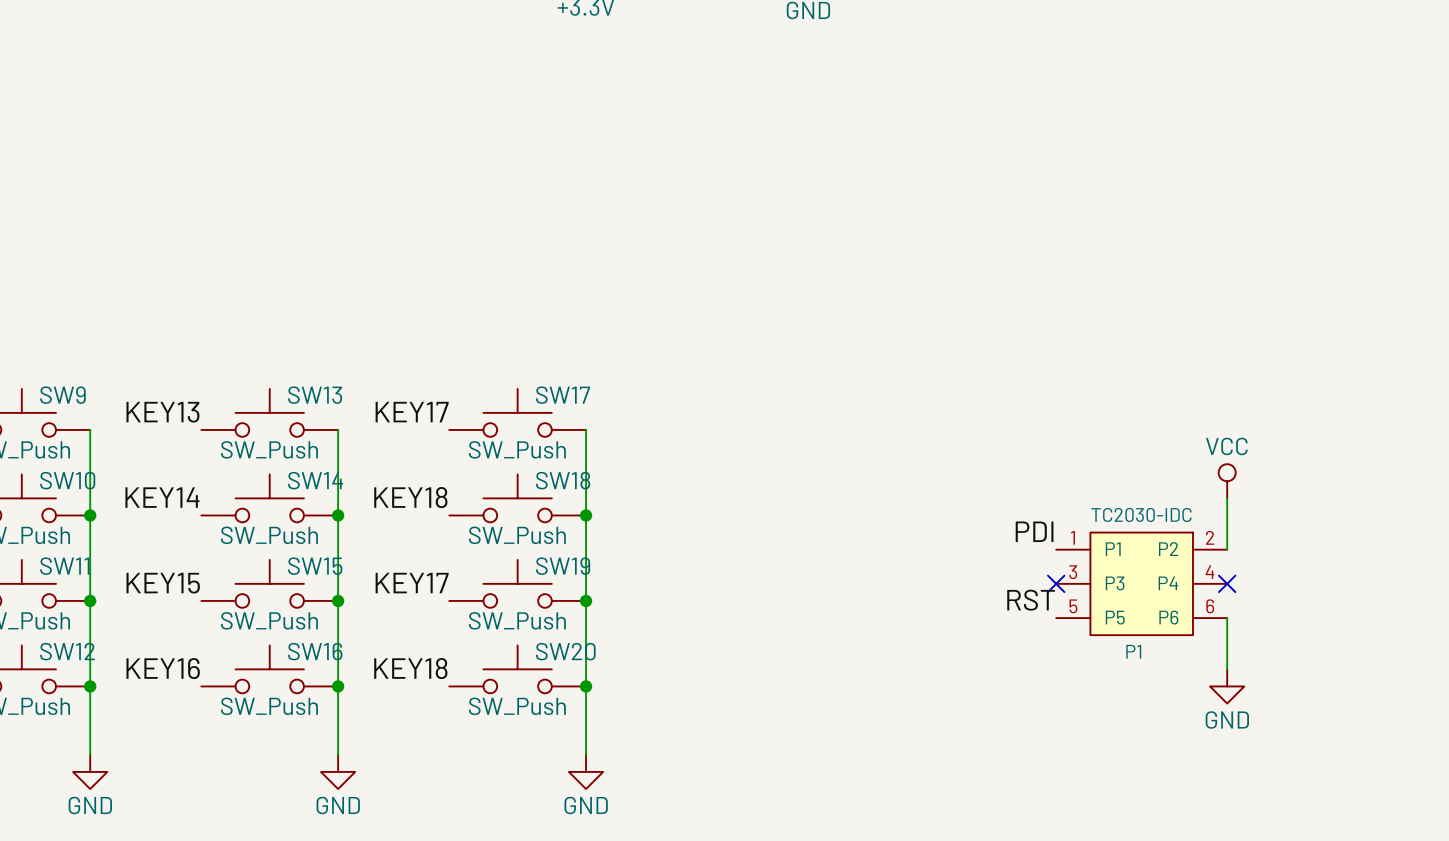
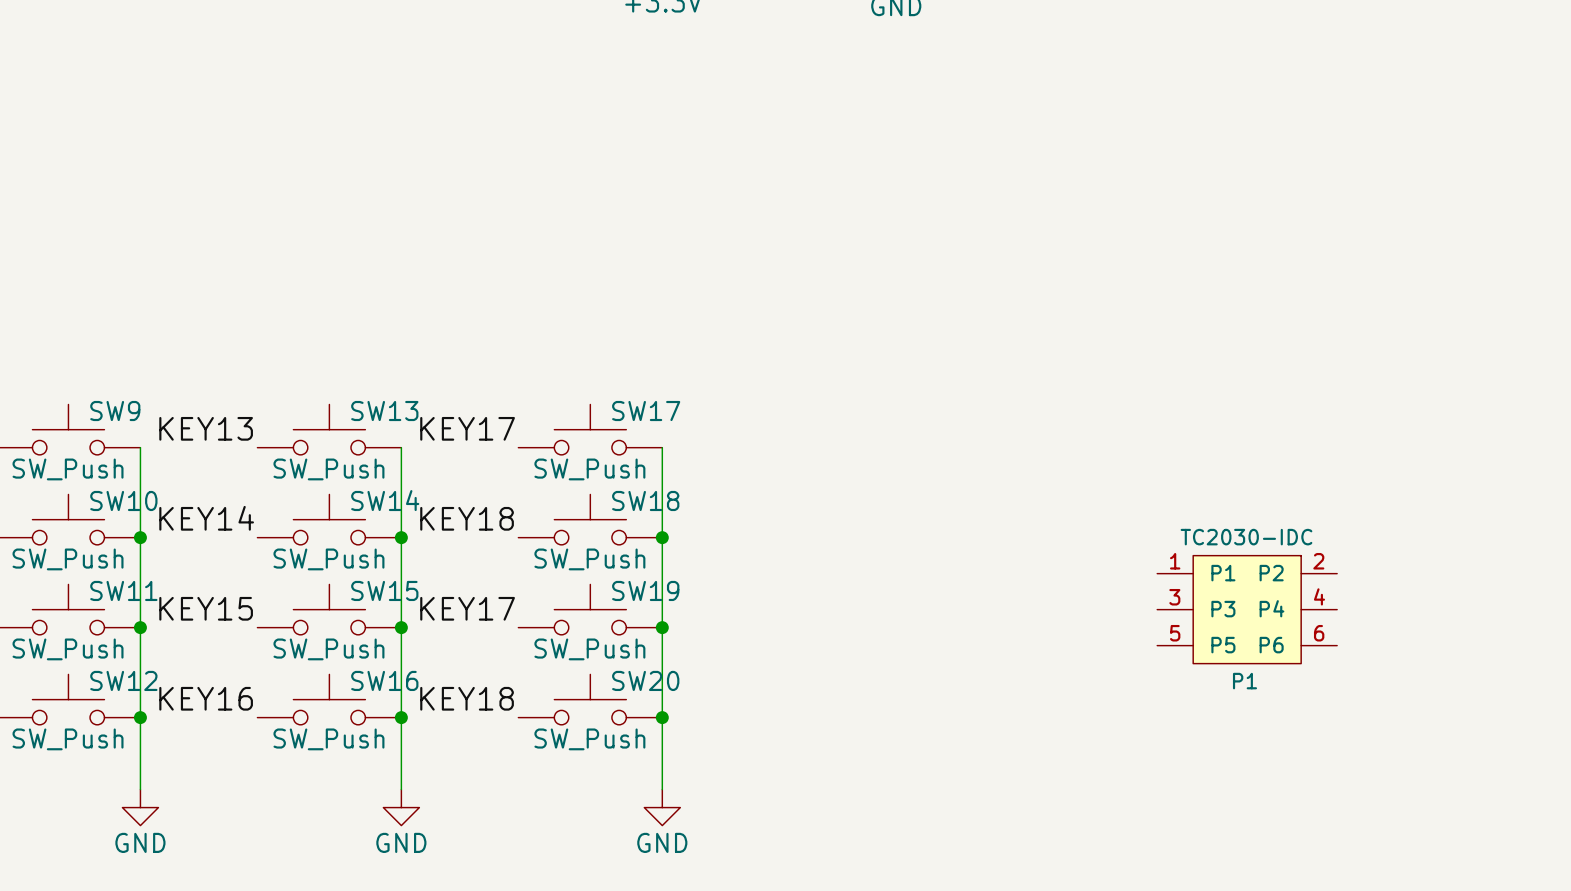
power symbol: VCC (1227, 481) -> none
wire: (1227, 498) (1227, 549) -> none
label: PDI (1034, 531) -> none
no-connect mark: (1056, 583) -> none
no-connect mark: (1227, 583) -> none
label: RST (1031, 600) -> none
wire: (1227, 618) (1227, 669) -> none
power symbol: GND (1227, 686) -> none

